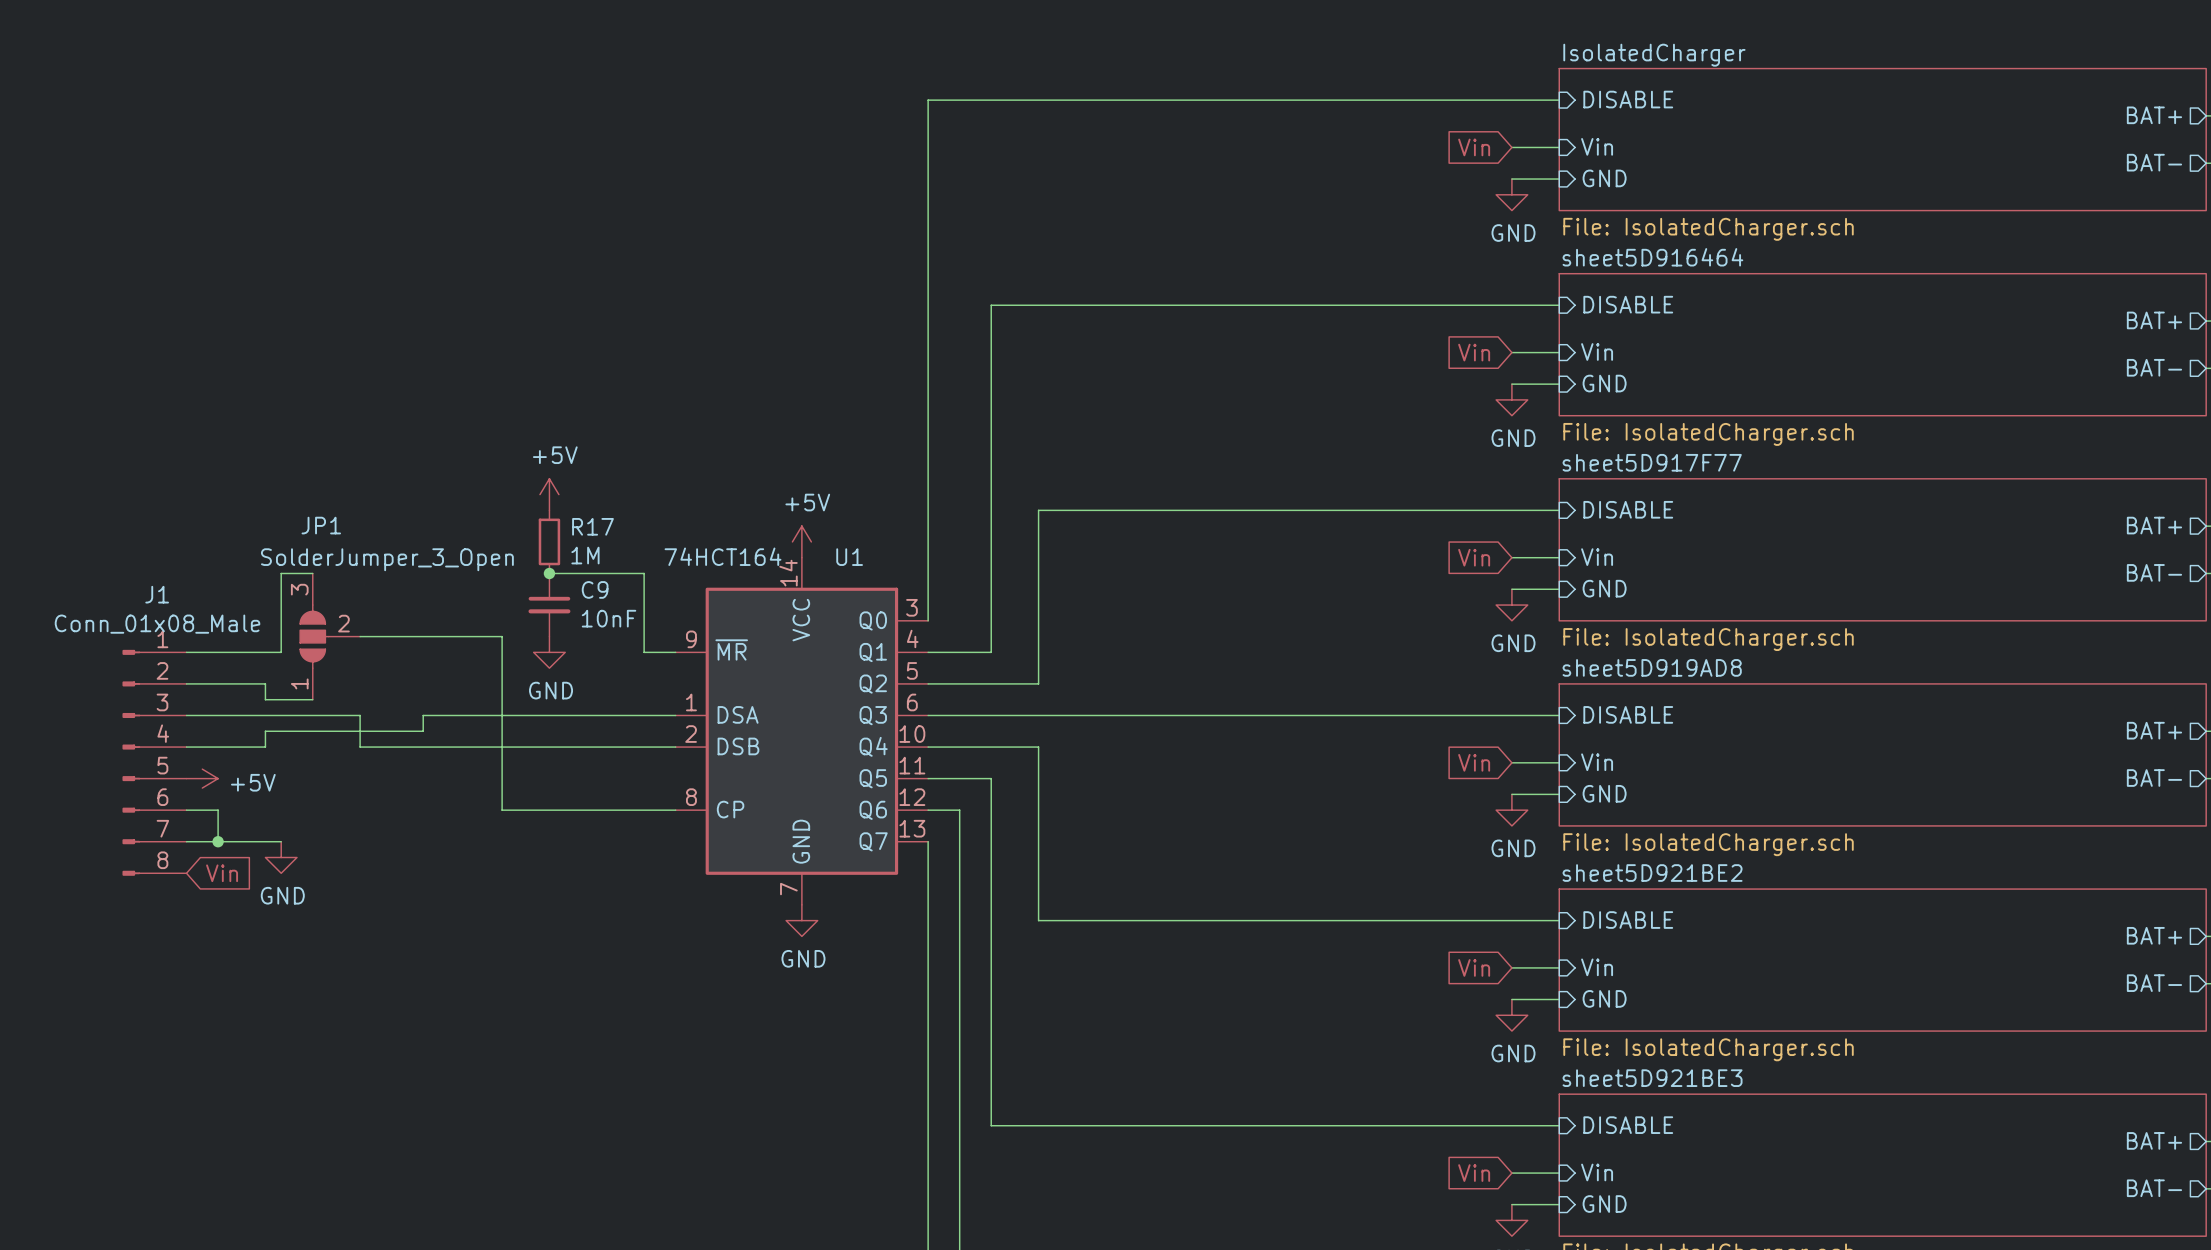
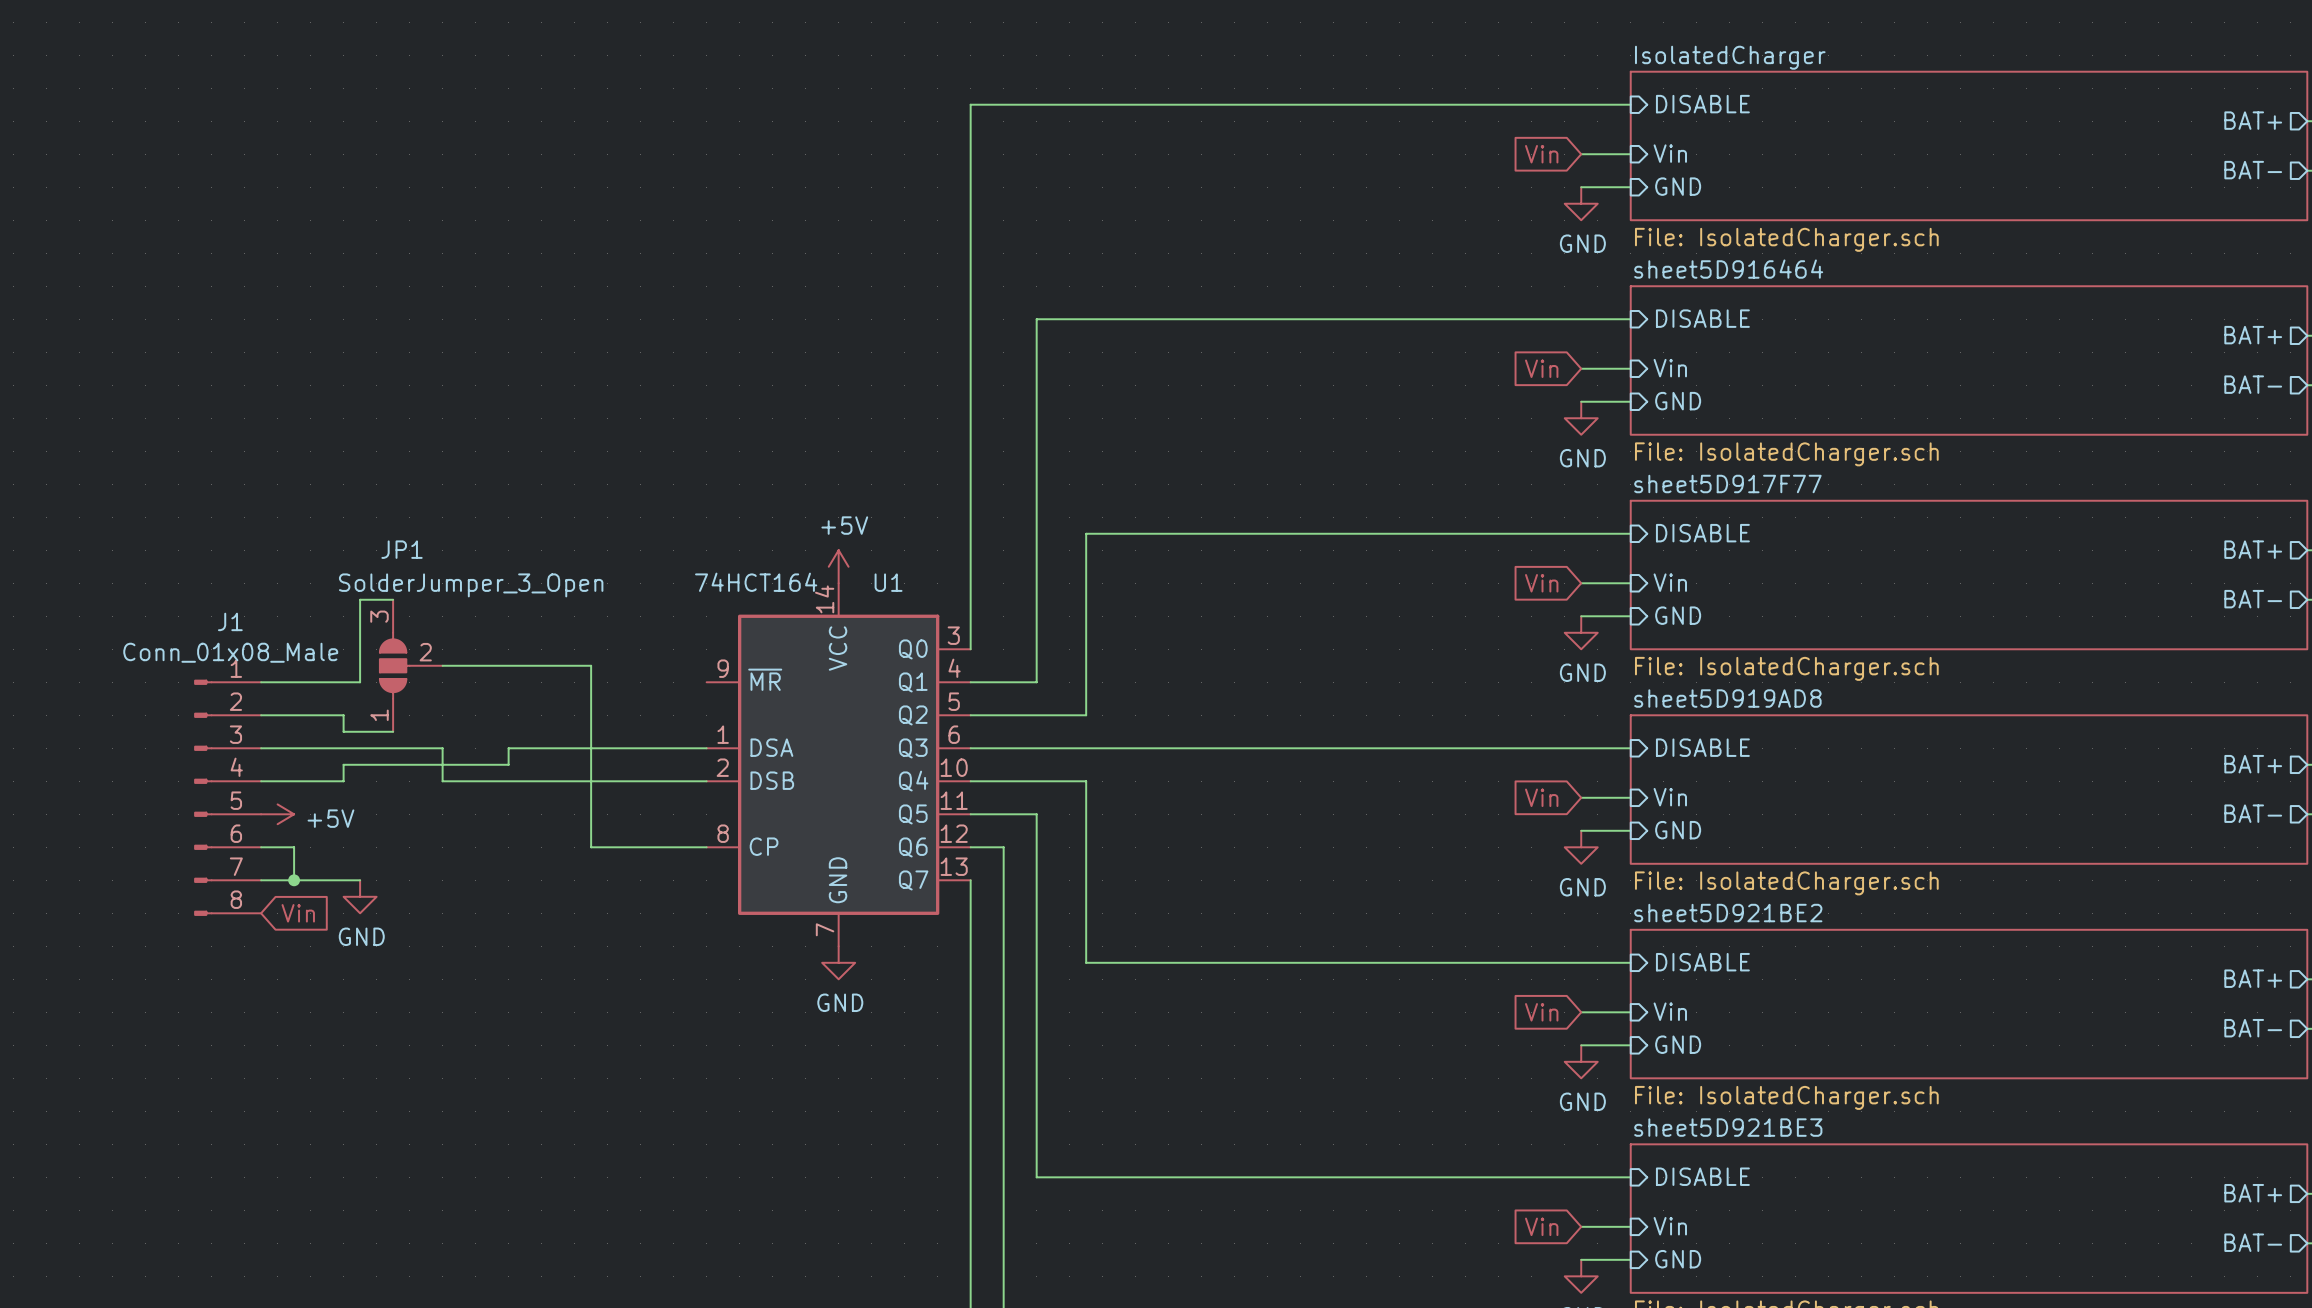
power symbol: +5V (549, 494) -> none
R17: 1M (549, 541) -> none
wire: (312, 573) (281, 573) (281, 652) -> (393, 599) (360, 599) (360, 682) (294, 682)
wire: (549, 573) (644, 573) (644, 652) (675, 652) -> none
junction: (549, 573) -> none
C9: 10nF (549, 605) -> none
JP1 position: (330, 636) -> (411, 665)
wire: (502, 636) (502, 810) (565, 810) -> (525, 665) (591, 665) (591, 847)
power symbol: GND (549, 652) -> none
wire: (265, 683) (265, 699) (312, 699) -> (277, 715) (343, 715) (343, 731) (393, 731)
wire: (360, 715) (360, 747) (423, 747) -> (376, 748) (442, 748)
wire: (423, 715) (486, 715) -> (442, 781) (442, 764) (508, 764) (508, 748)
wire: (328, 731) (265, 731) (265, 747) -> (343, 764) (343, 781) (277, 781)
J1 position: (154, 762) -> (227, 797)
power symbol position: +5V (202, 778) -> +5V (277, 814)
wire: (186, 810) (218, 810) (218, 841) -> none
wire: none -> (261, 847) (294, 847) (294, 880) (360, 880)
junction position: (218, 841) -> (294, 880)
power symbol position: GND (281, 857) -> GND (360, 896)
global label position: Vin (222, 873) -> Vin (298, 913)

